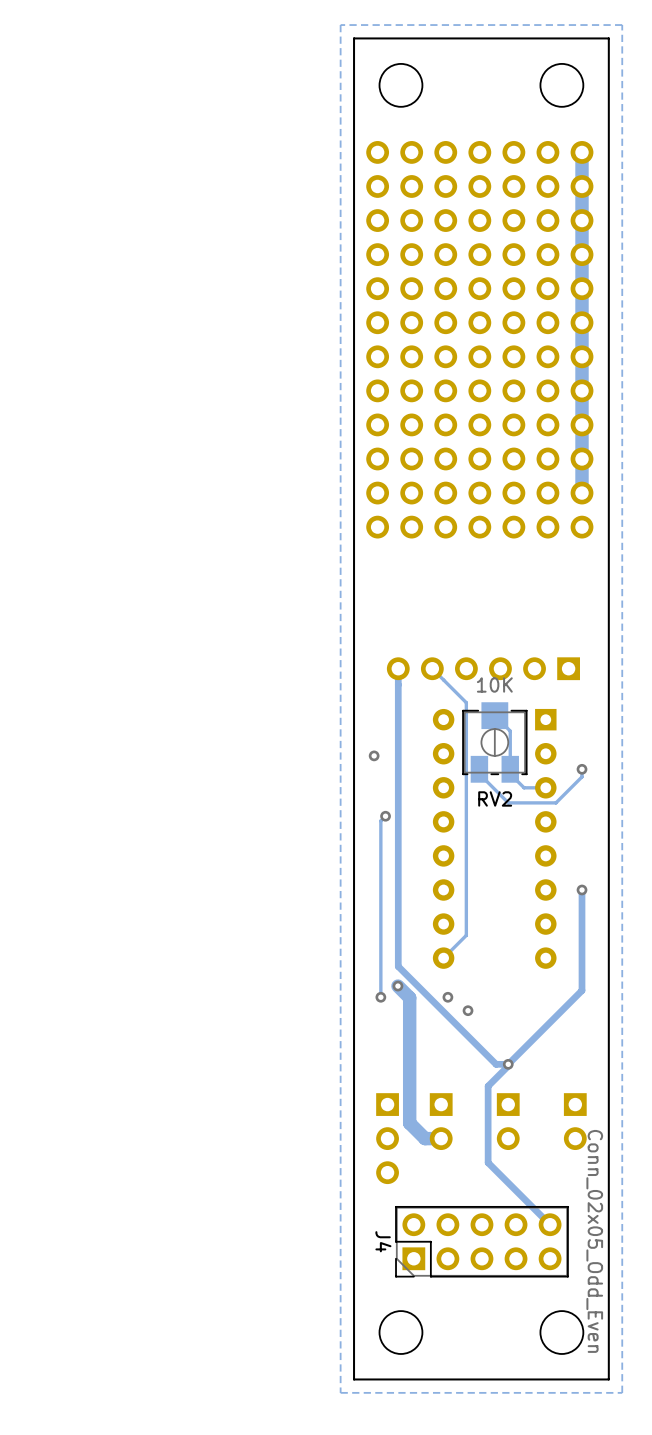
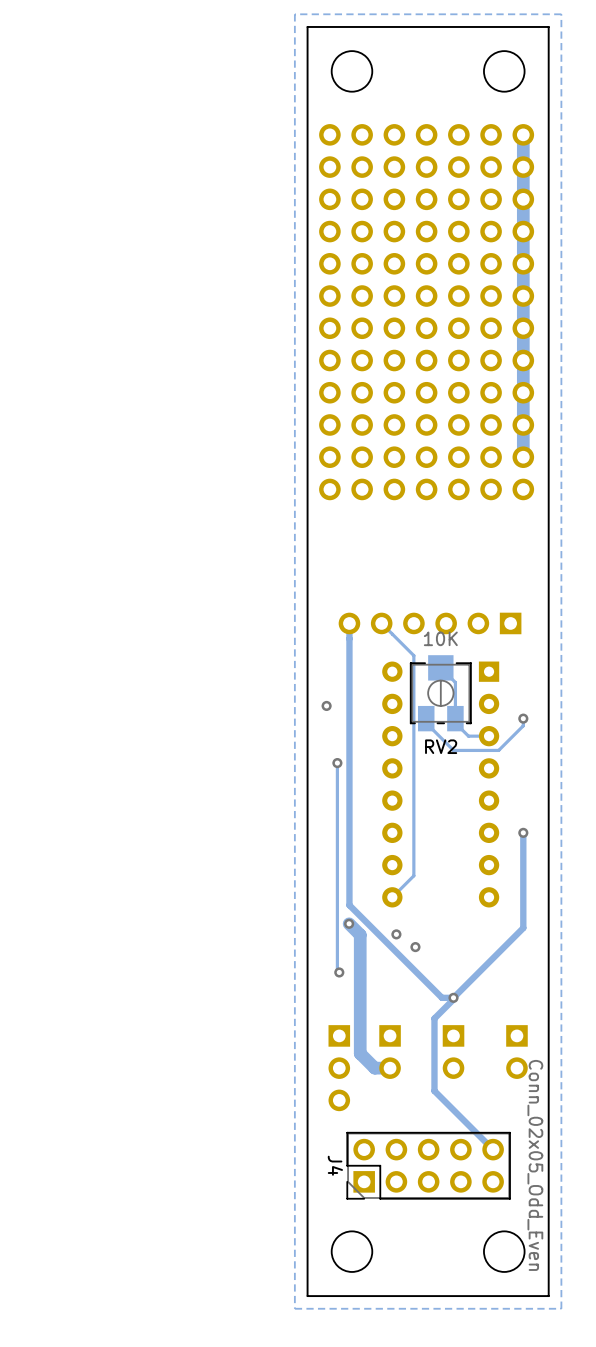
track: (385, 816) (380, 820) (380, 997) -> (337, 763) (337, 970) (339, 972)
via position: (380, 997) -> (339, 972)

